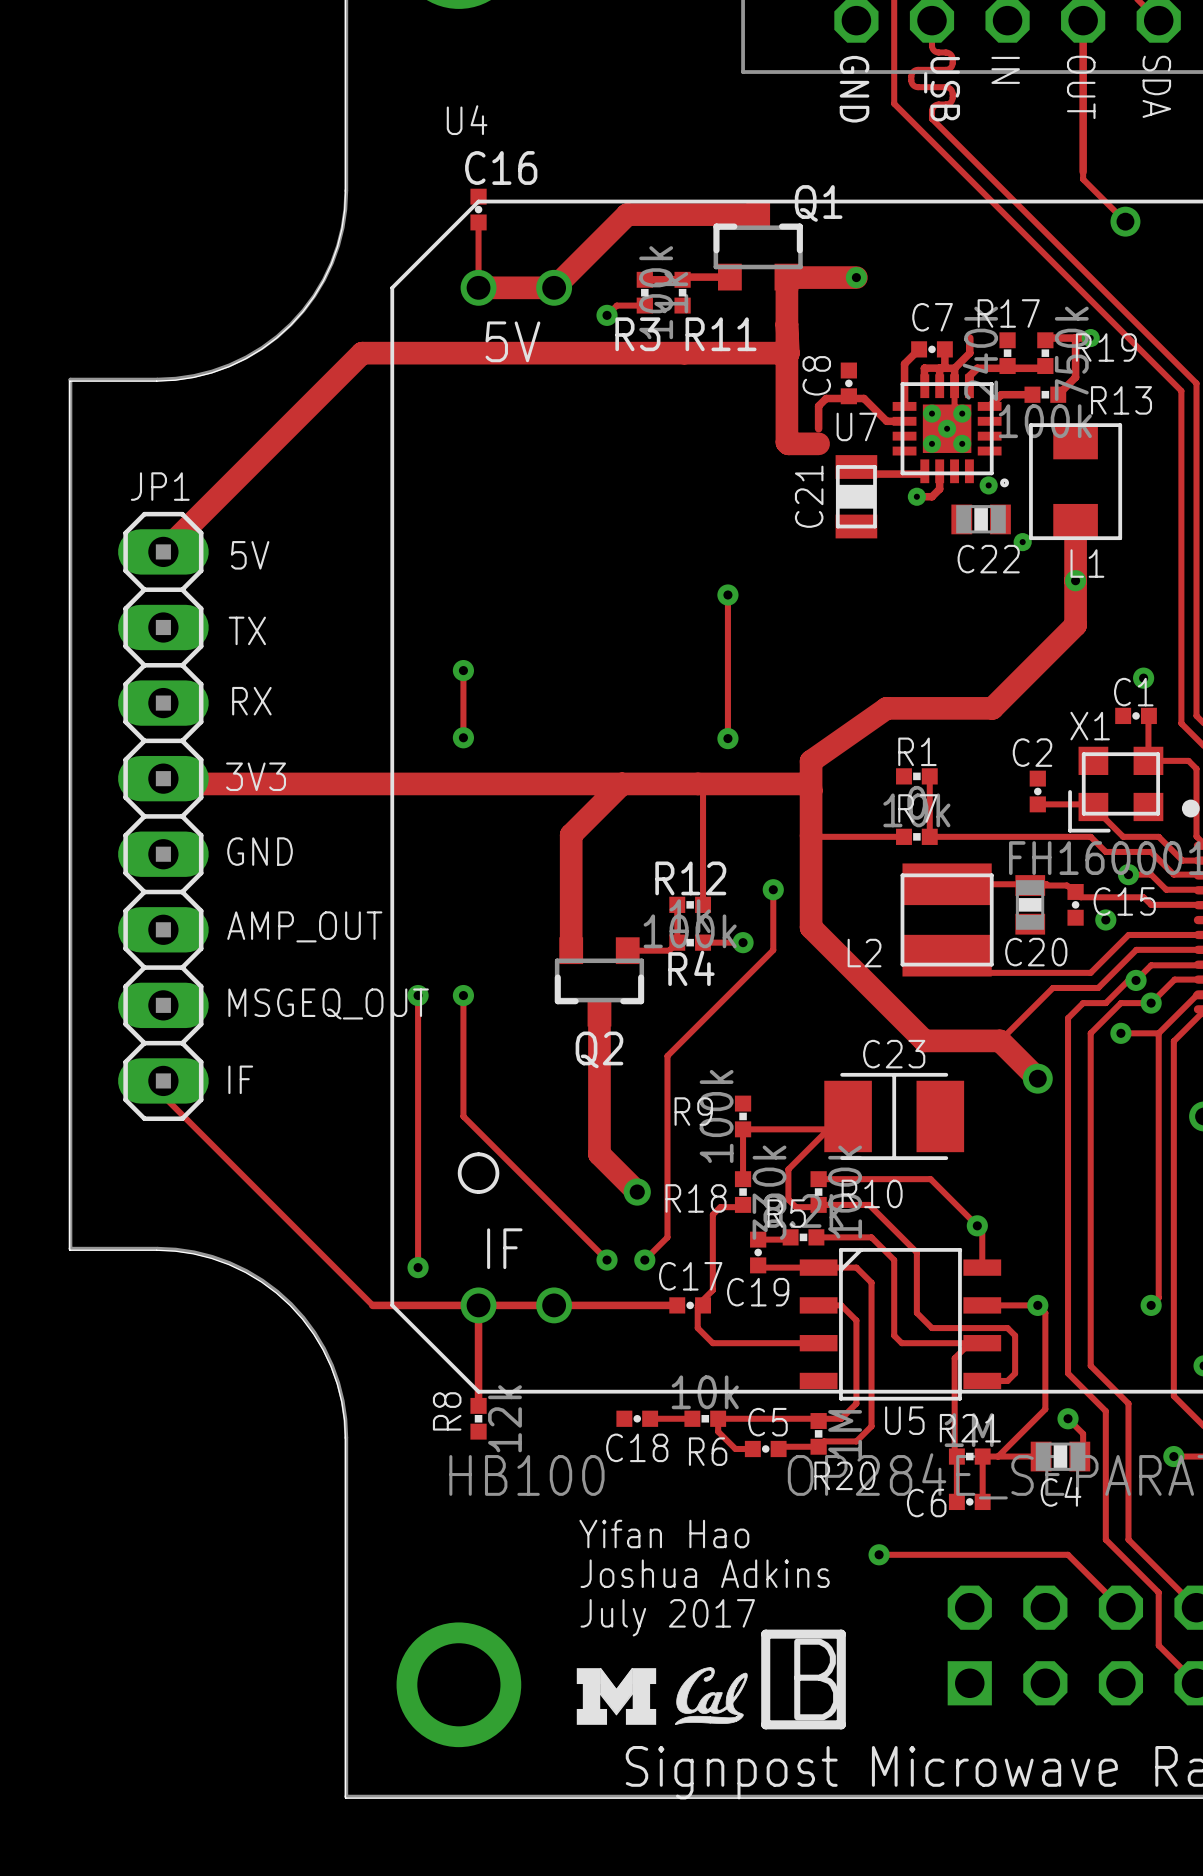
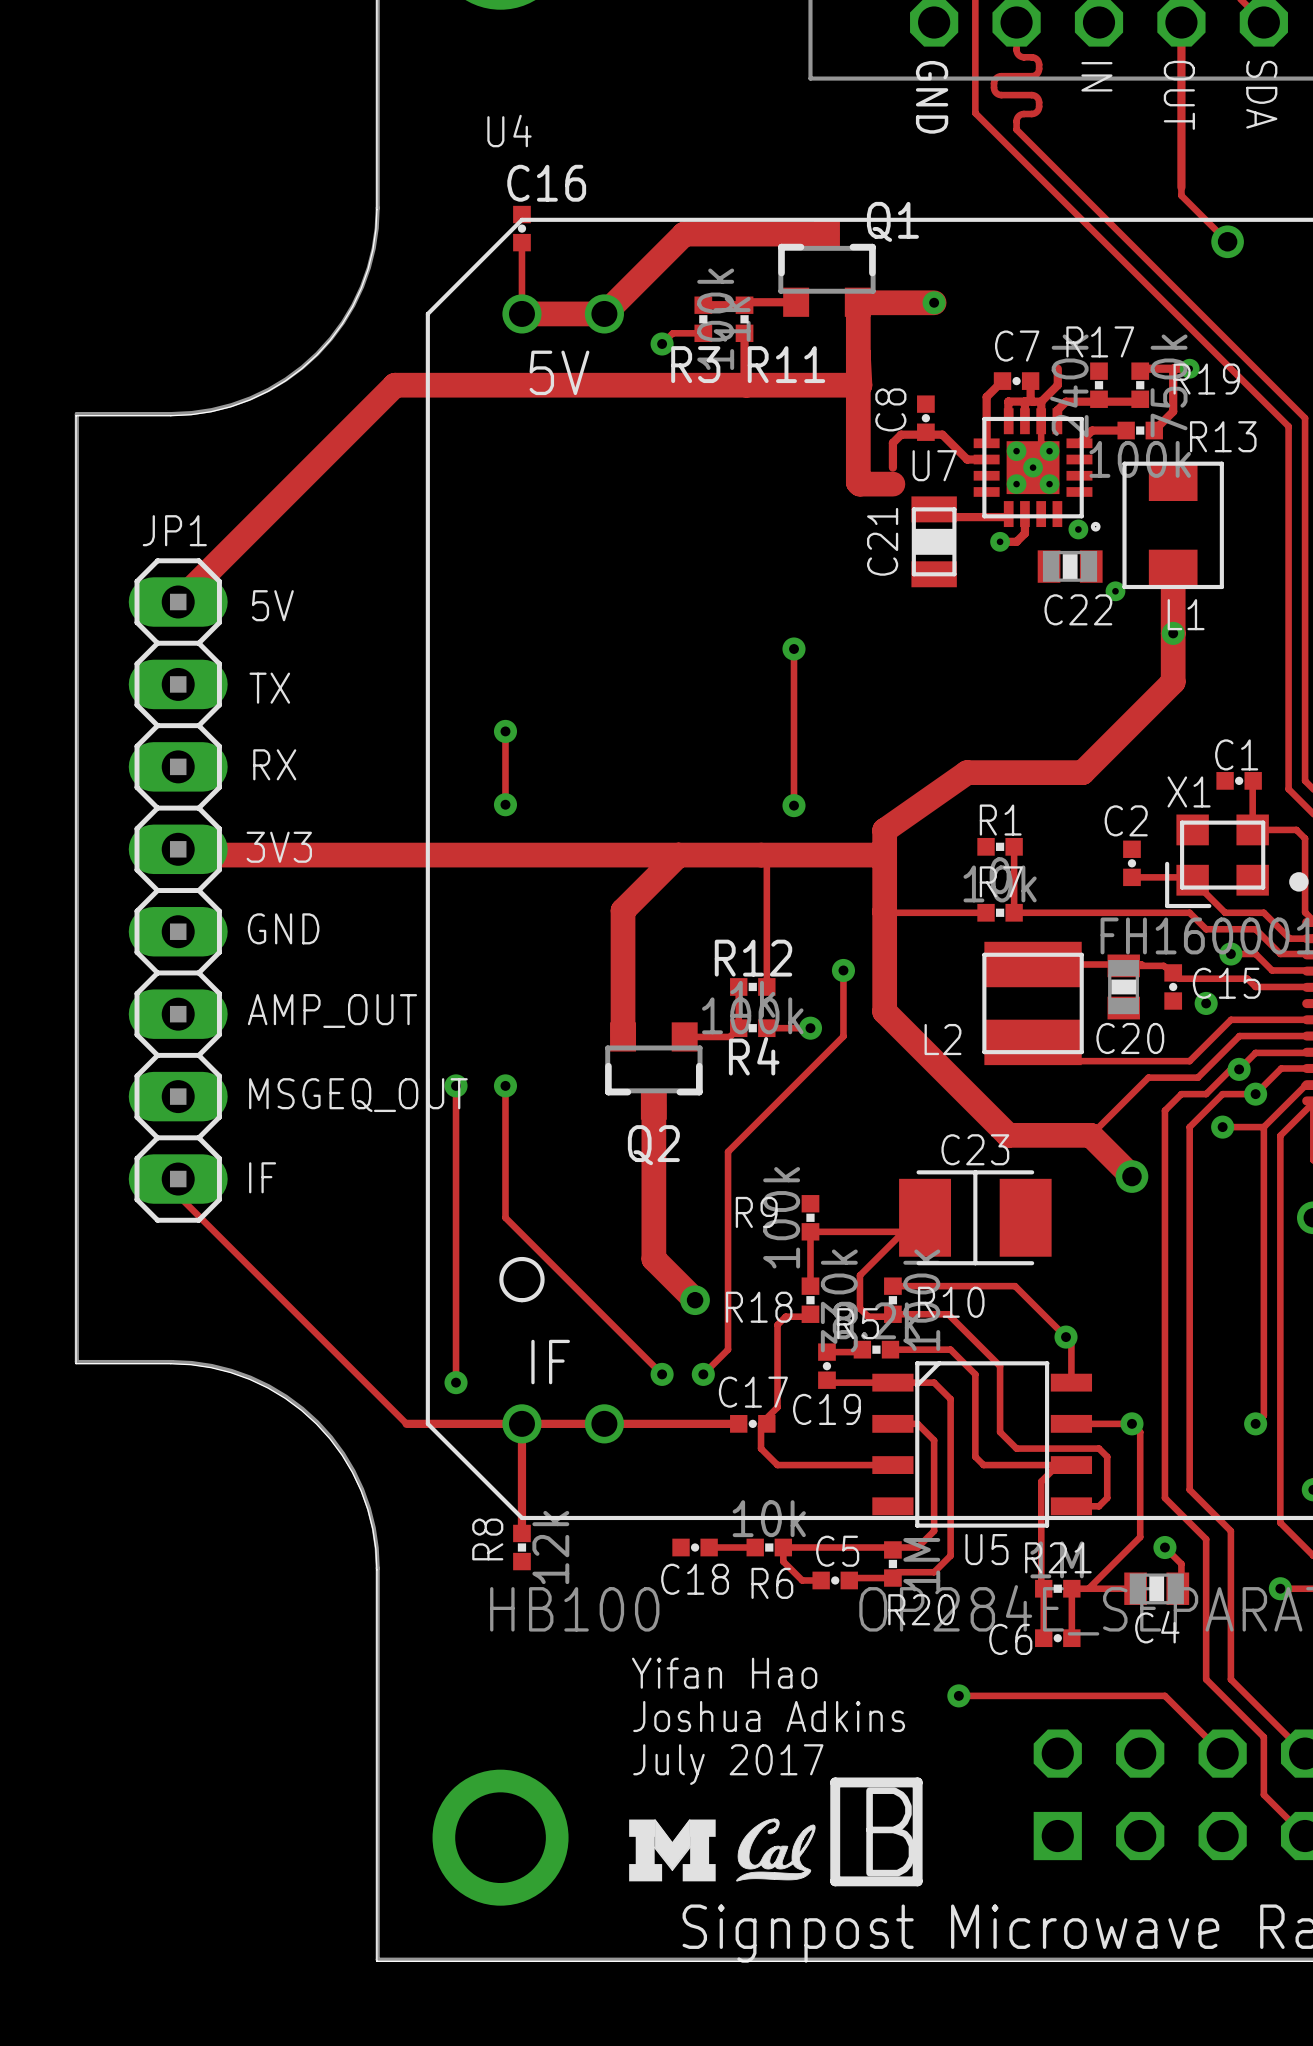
text: - (925, 82) -> none
text: USB (945, 89) -> none
track: none -> (744, 333) (744, 383)
via: (1143, 678) -> none

